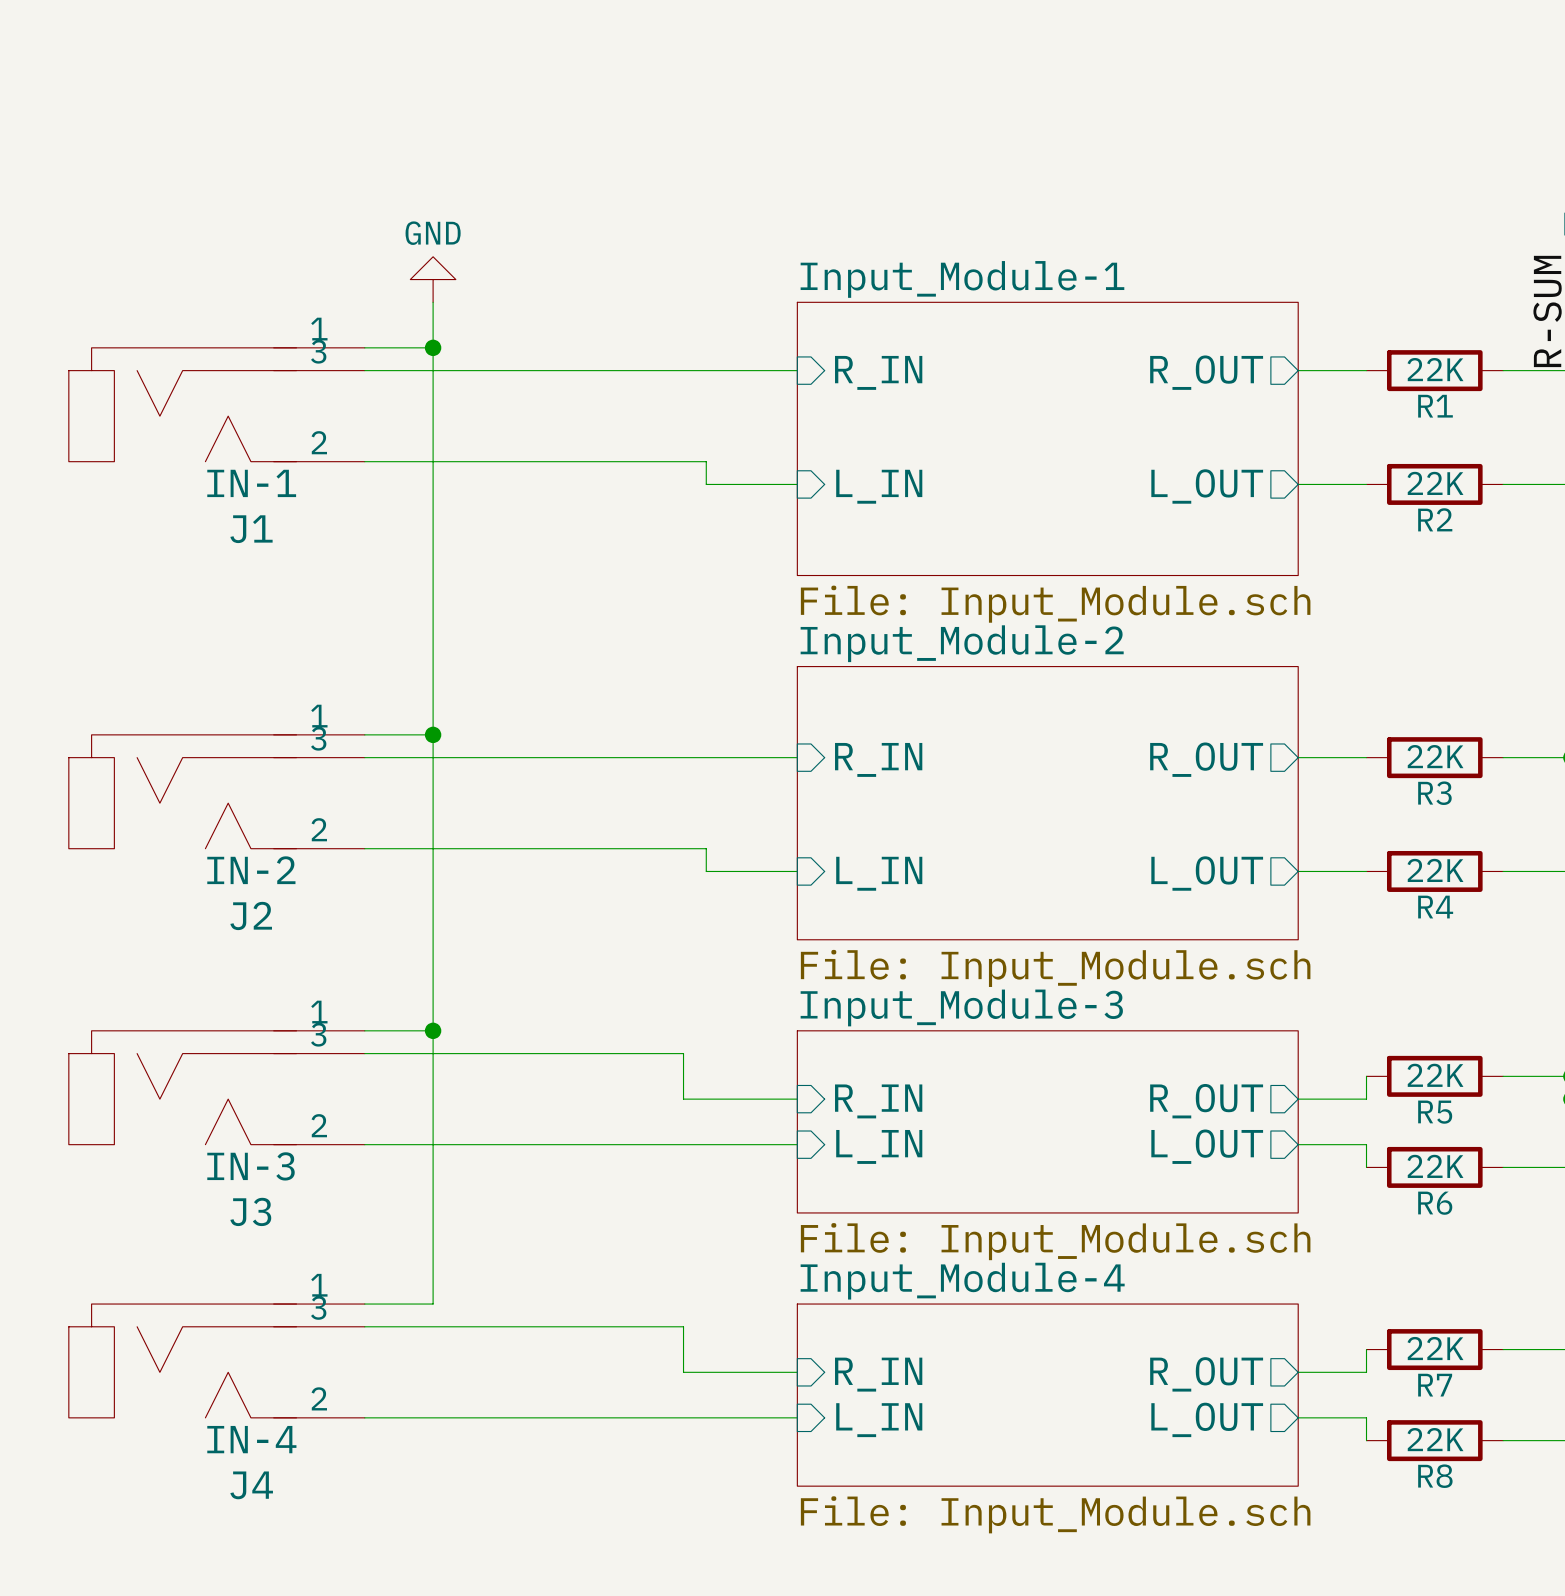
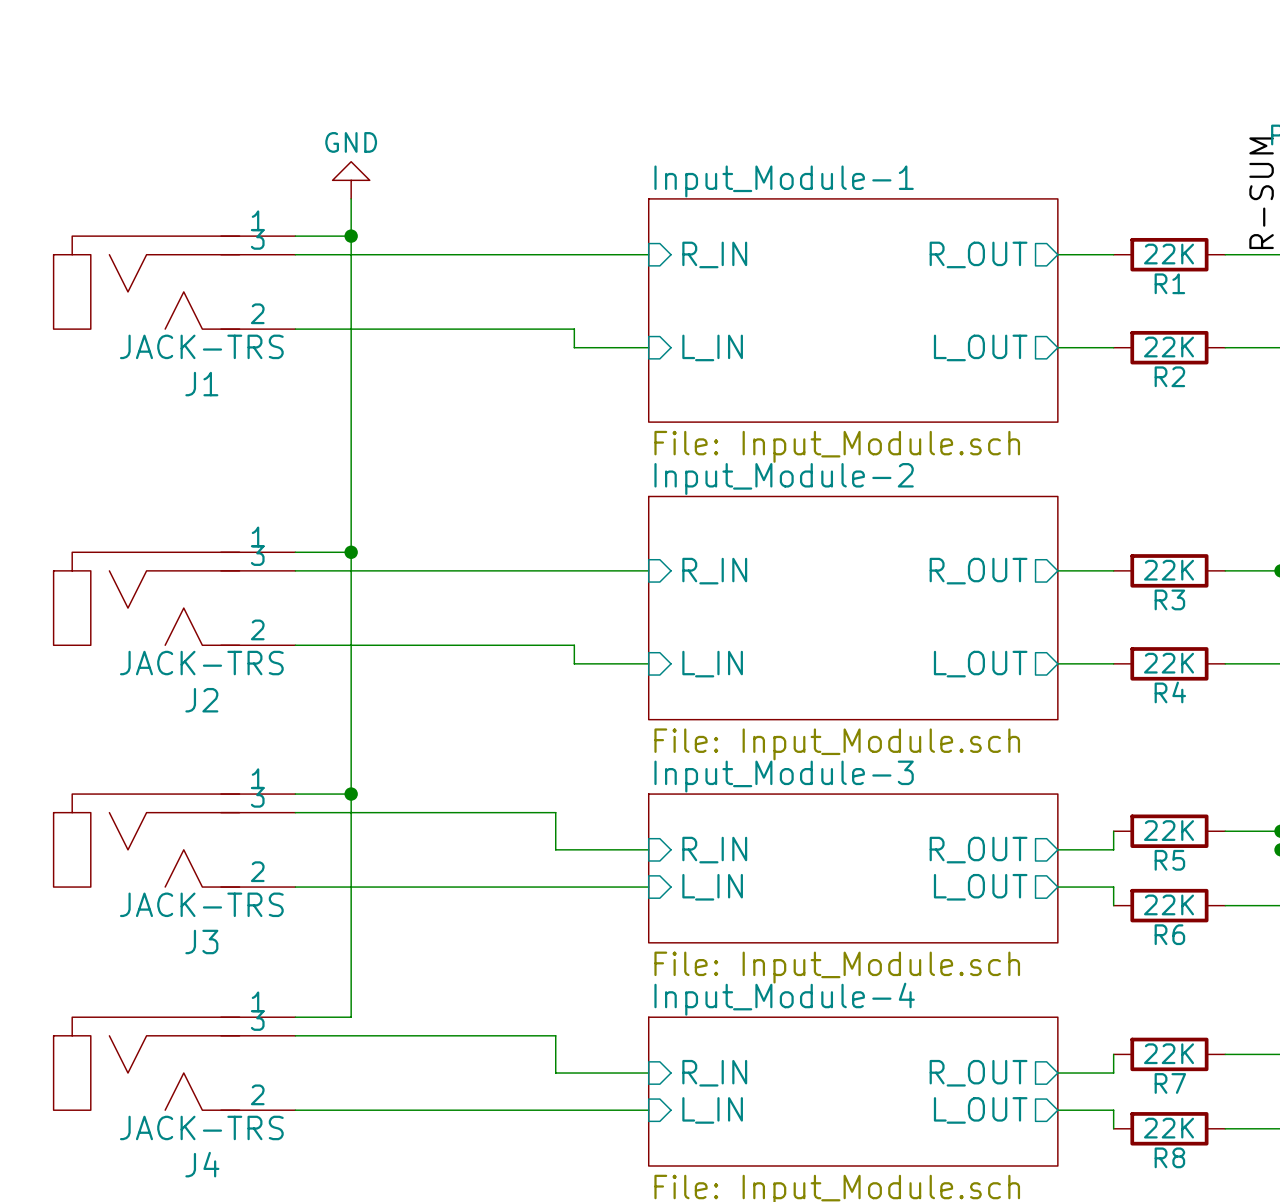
J1 value: IN-1 (251, 483) -> JACK-TRS (201, 346)
J2 value: IN-2 (251, 870) -> JACK-TRS (201, 663)
J3 value: IN-3 (251, 1166) -> JACK-TRS (201, 904)
J4 value: IN-4 (251, 1439) -> JACK-TRS (201, 1127)

